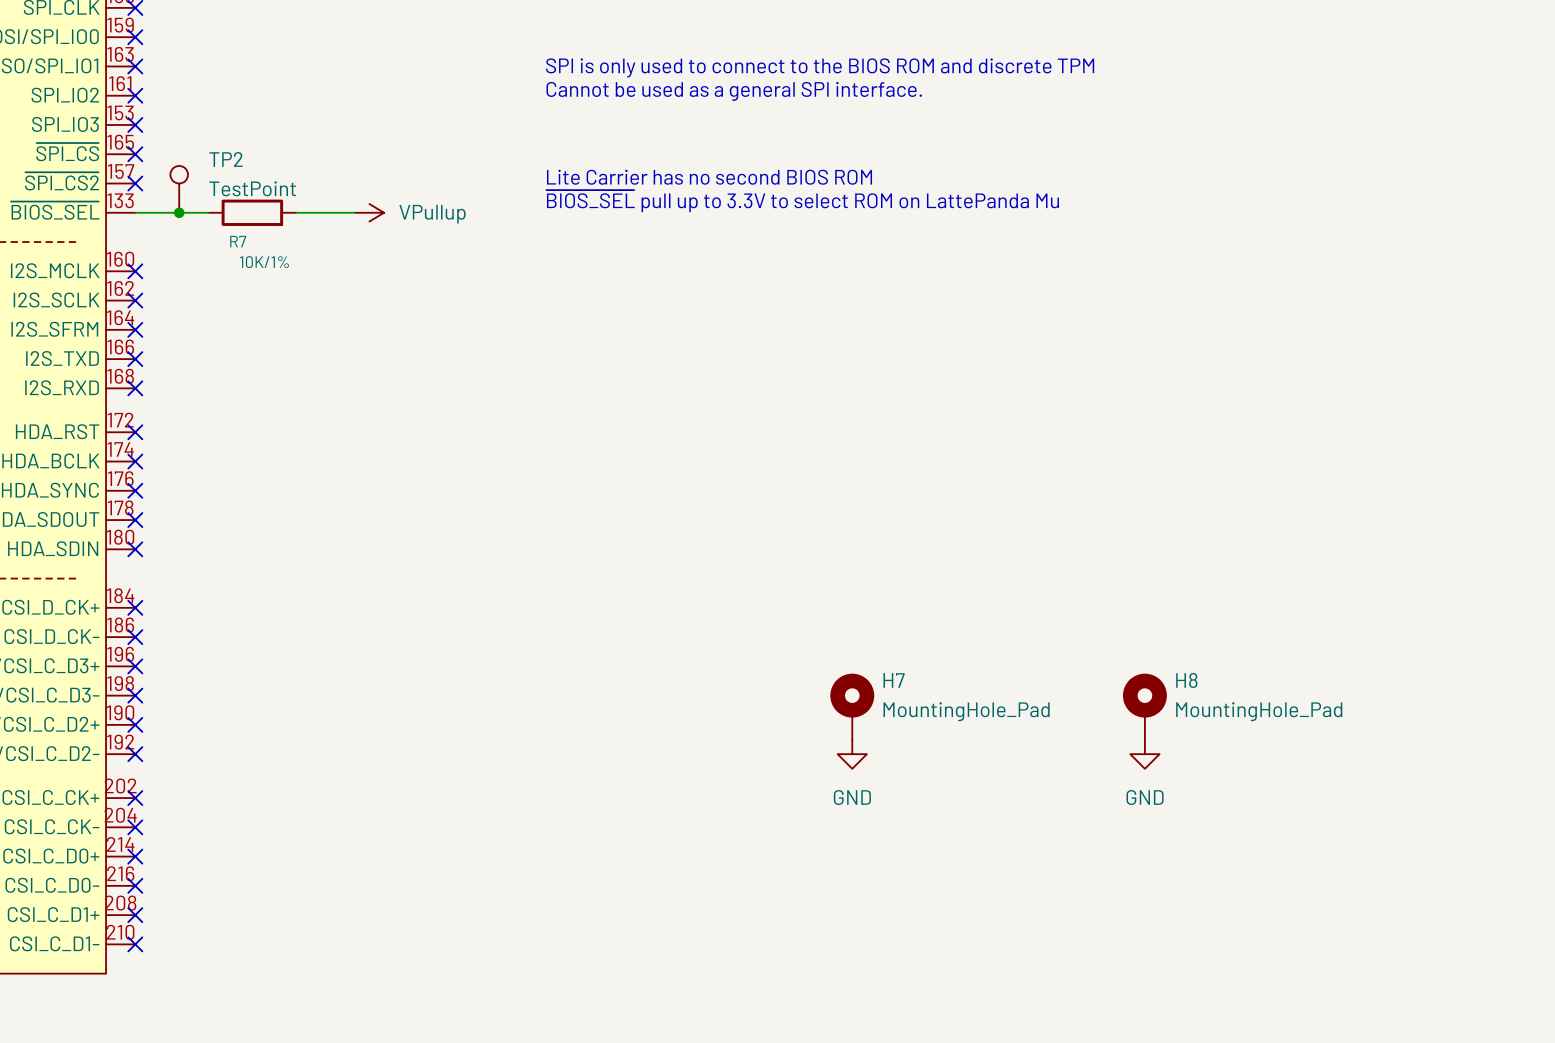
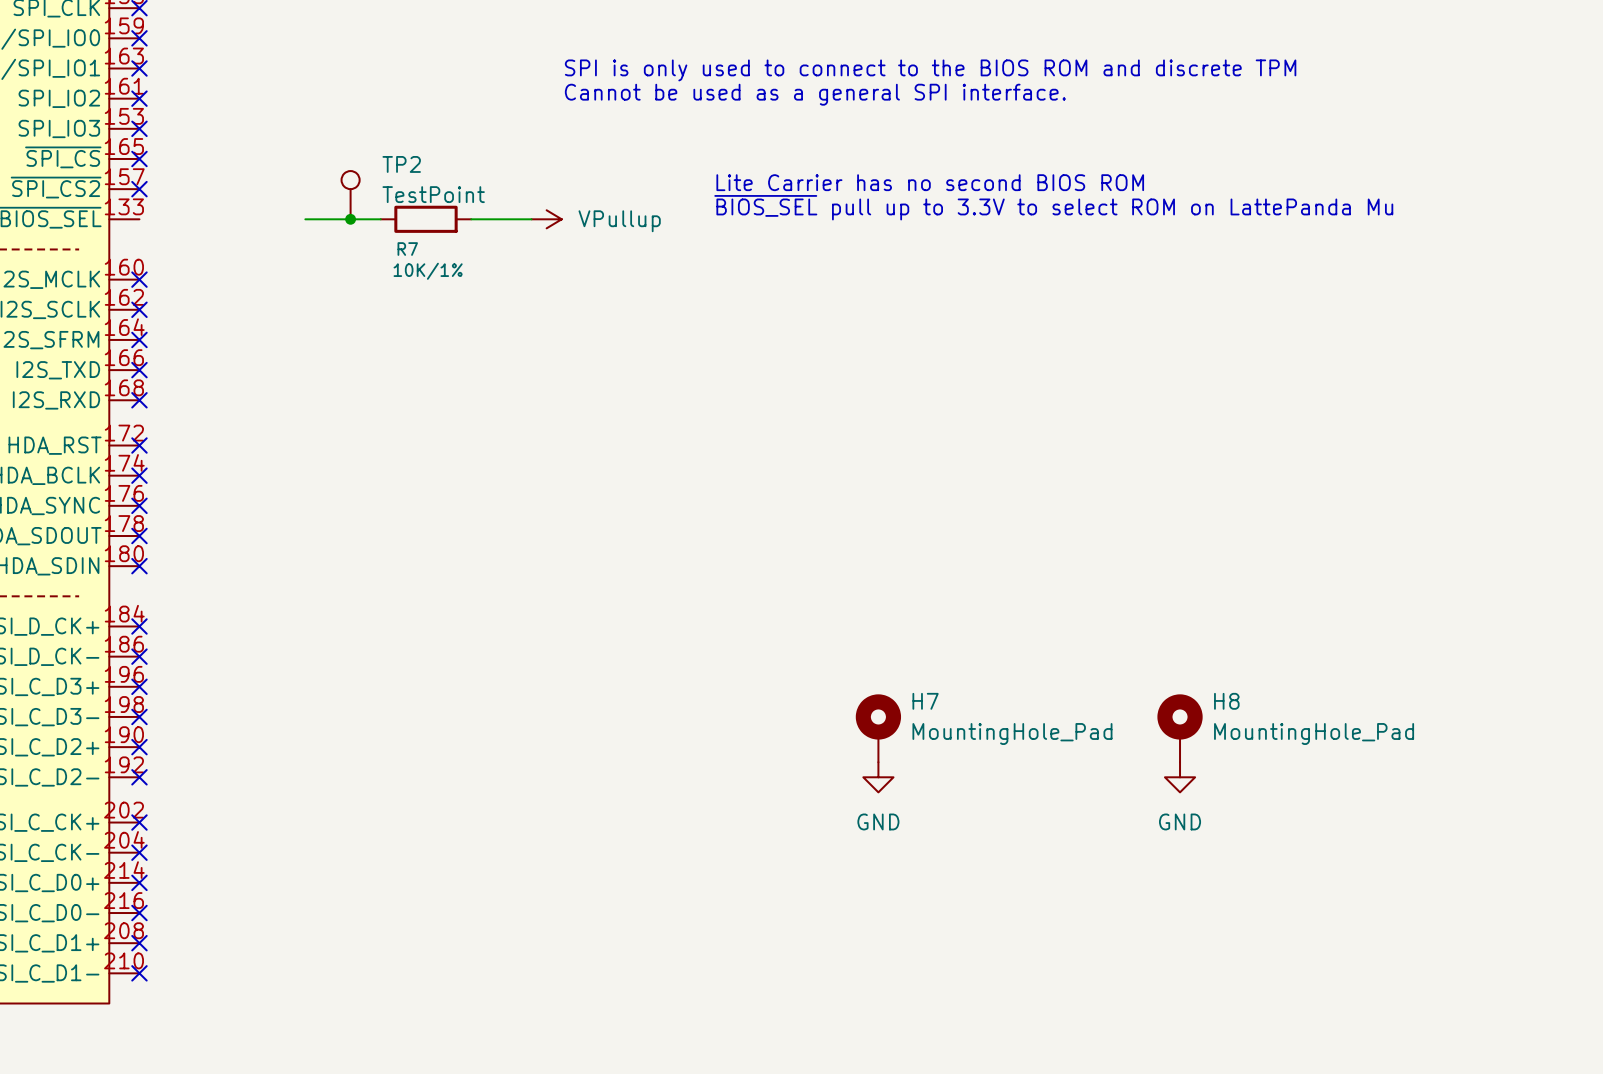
text position: Lite Carrier has no second BIOS ROM (709, 177) -> Lite Carrier has no second BIOS ROM (930, 182)
TP2 position: (179, 189) -> (350, 195)
text position: ~{BIOS_SEL} pull up to 3.3V to select ROM on LattePanda Mu (802, 201) -> ~{BIOS_SEL} pull up to 3.3V to select ROM on LattePanda Mu (1053, 207)
wire: (135, 212) (208, 212) -> none
junction: (179, 212) -> none
R7 position: (252, 212) -> (425, 219)
junction: none -> (350, 219)
power symbol position: VPullup (369, 212) -> VPullup (546, 219)
wire: none -> (471, 219) (531, 219)

